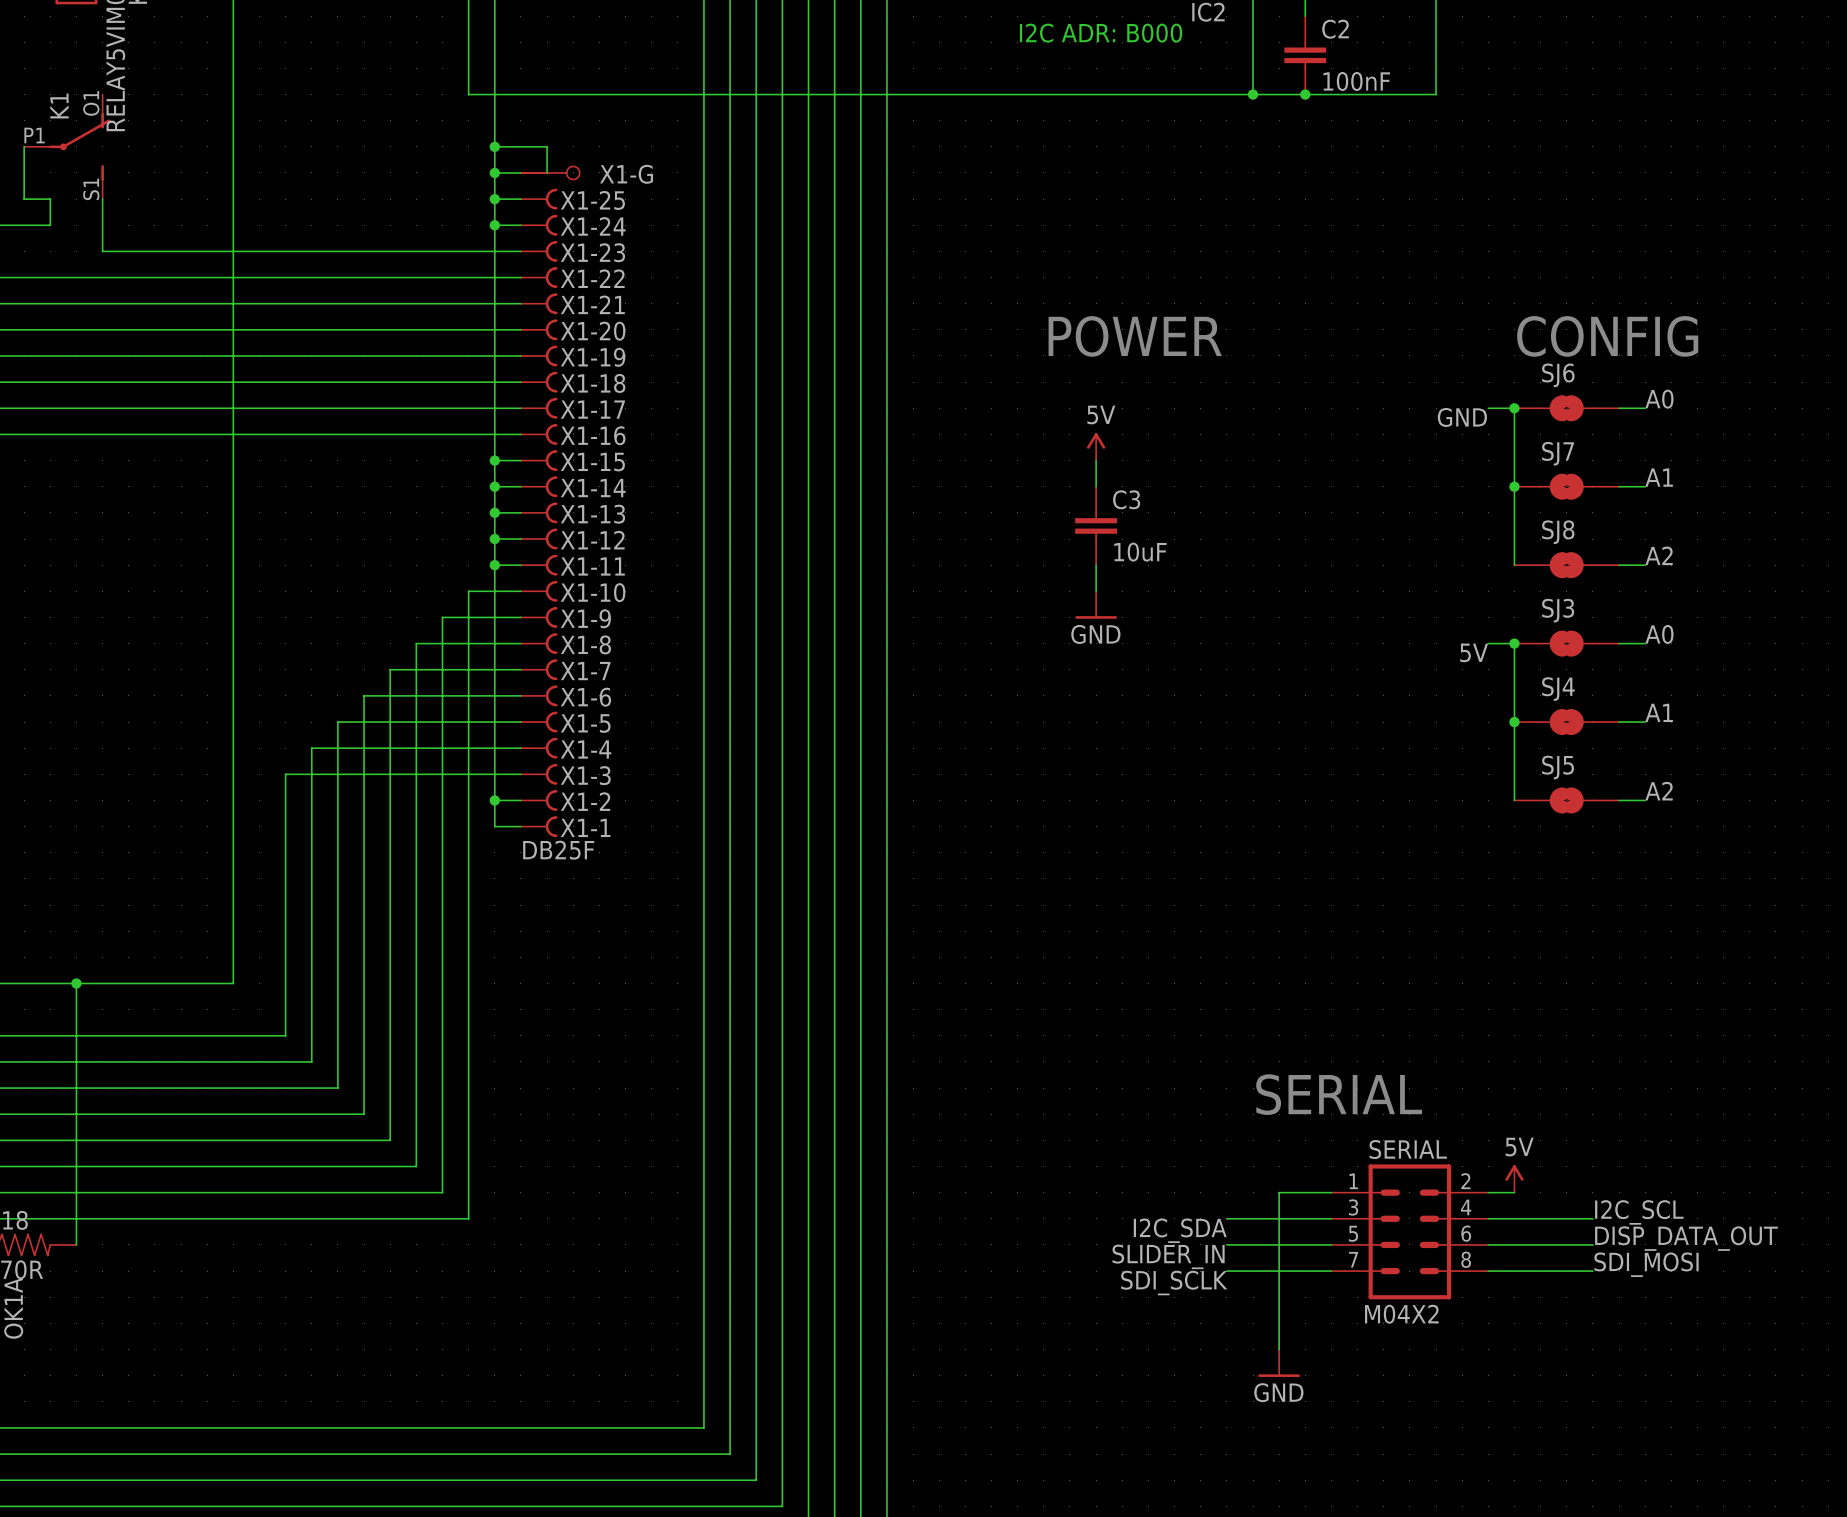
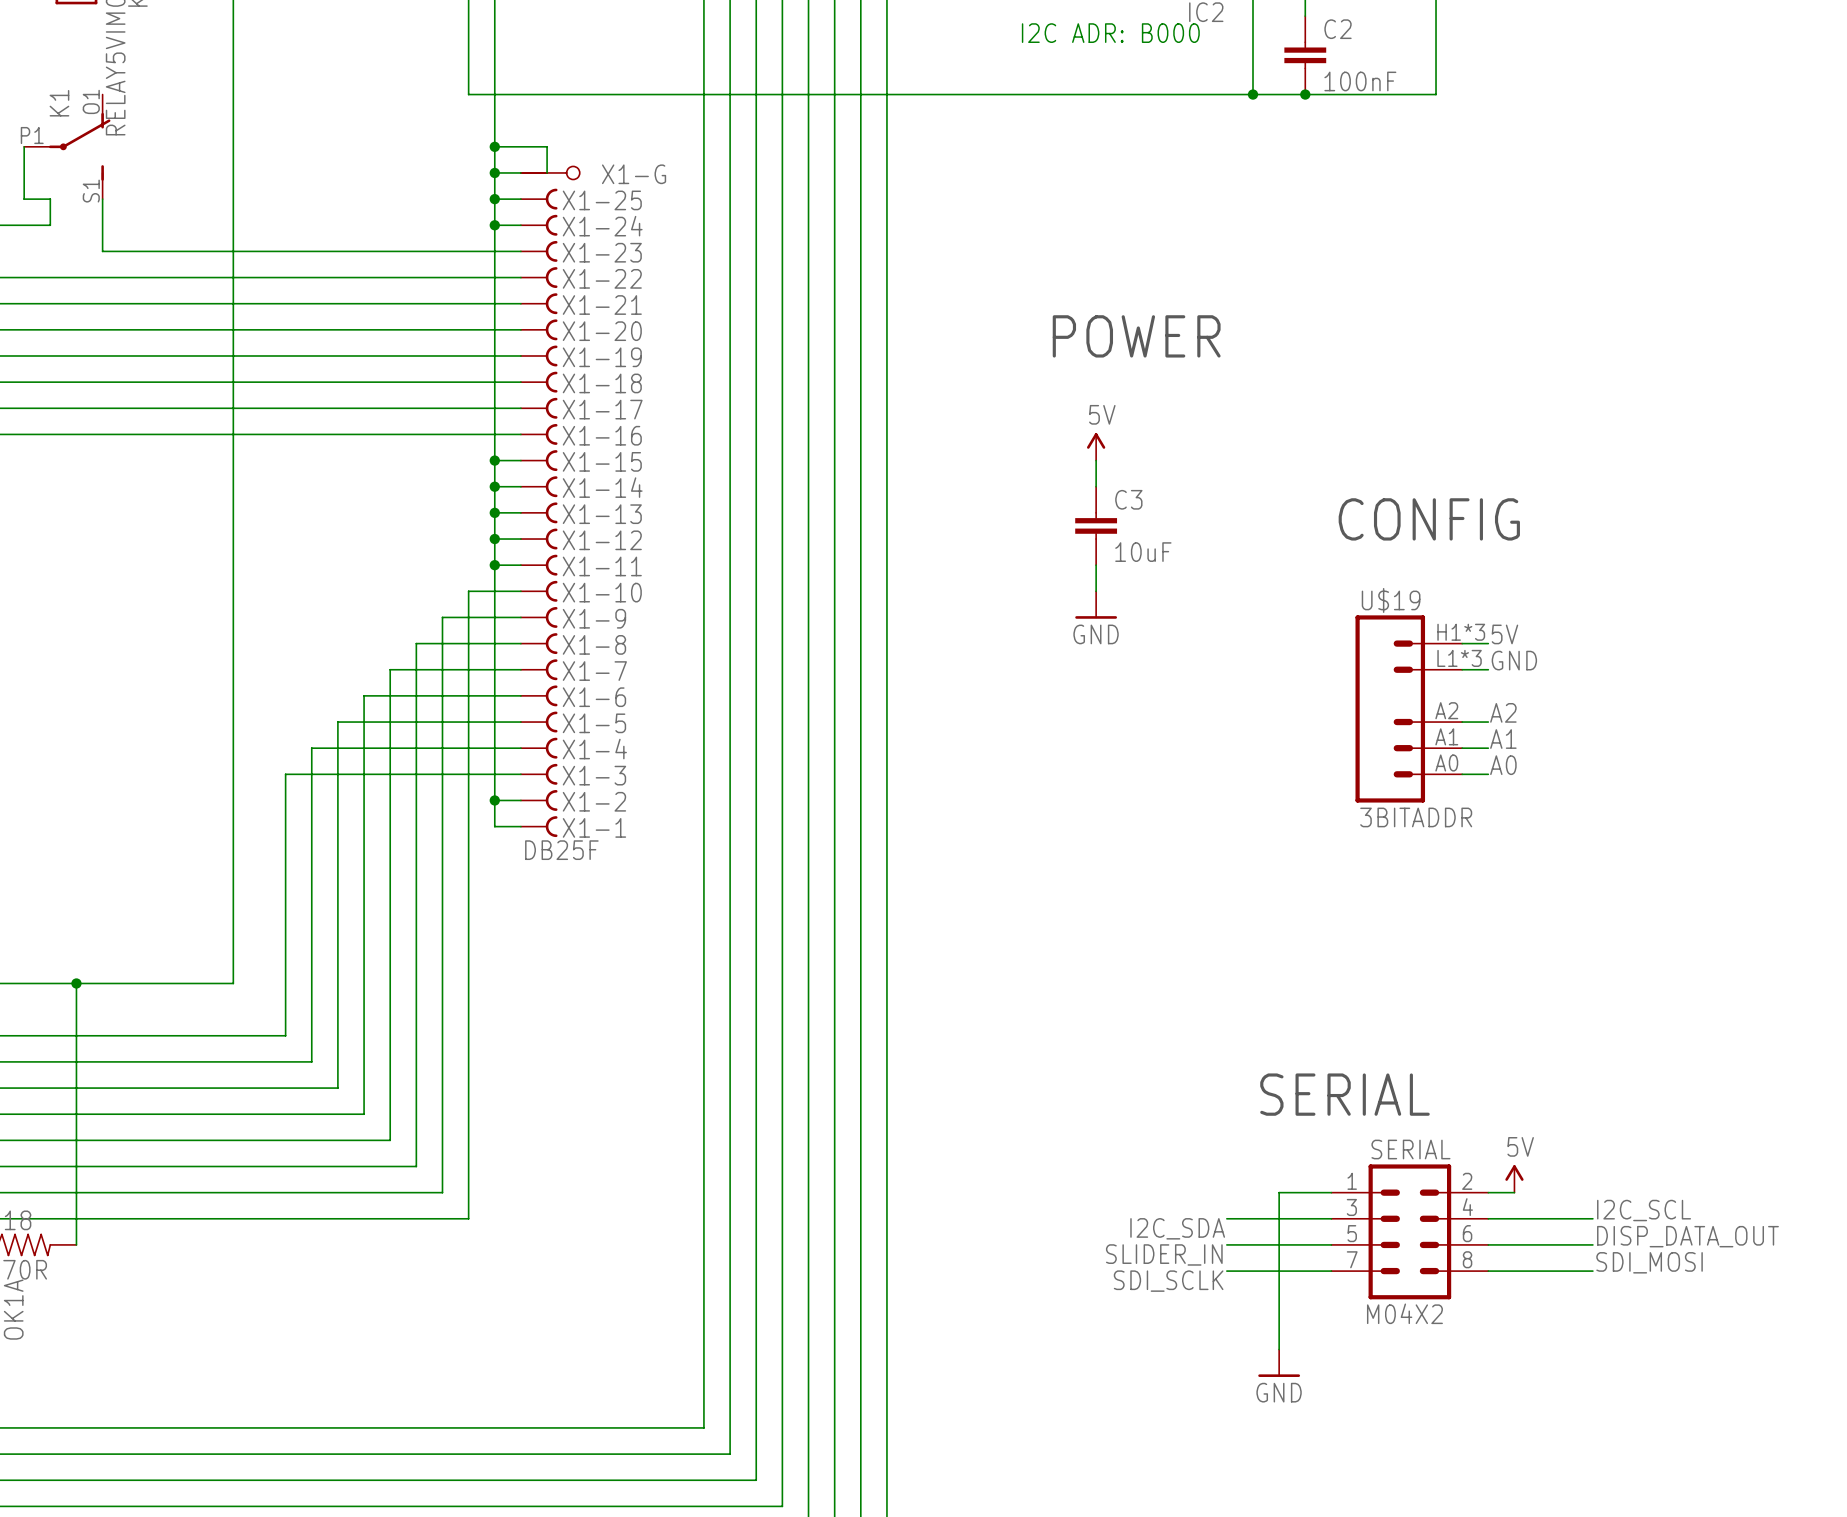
text: CONFIG (1607, 336) -> none
label: A0 (1659, 399) -> none
wire: (1488, 408) (1514, 408) (1514, 565) -> none
junction: (1514, 408) -> none
SJ6: (1566, 408) -> none
wire: (1619, 408) (1645, 408) -> none
label: GND (1462, 417) -> none
label: A1 (1659, 477) -> none
junction: (1514, 486) -> none
SJ7: (1566, 486) -> none
wire: (1619, 486) (1645, 486) -> none
text: none -> CONFIG (1429, 519)
label: A2 (1659, 555) -> none
SJ8: (1566, 565) -> none
wire: (1619, 565) (1645, 565) -> none
label: A0 (1659, 634) -> none
wire: (1488, 643) (1514, 643) (1514, 800) -> (1488, 643) (1462, 643)
junction: (1514, 643) -> none
SJ3: (1566, 643) -> none
wire: (1619, 643) (1645, 643) -> (1462, 669) (1488, 669)
label position: 5V (1474, 652) -> 5V (1504, 634)
label: none -> GND (1514, 660)
U$19: none -> 3BITADDR (1408, 708)
label: none -> A2 (1503, 712)
label: A1 (1659, 712) -> none
junction: (1514, 722) -> none
SJ4: (1566, 722) -> none
wire: (1619, 722) (1645, 722) -> (1462, 722) (1488, 722)
label: none -> A1 (1503, 739)
label: none -> A0 (1503, 765)
wire: none -> (1462, 774) (1488, 774)
label: A2 (1659, 791) -> none
SJ5: (1566, 800) -> none
wire: (1619, 800) (1645, 800) -> (1462, 748) (1488, 748)

